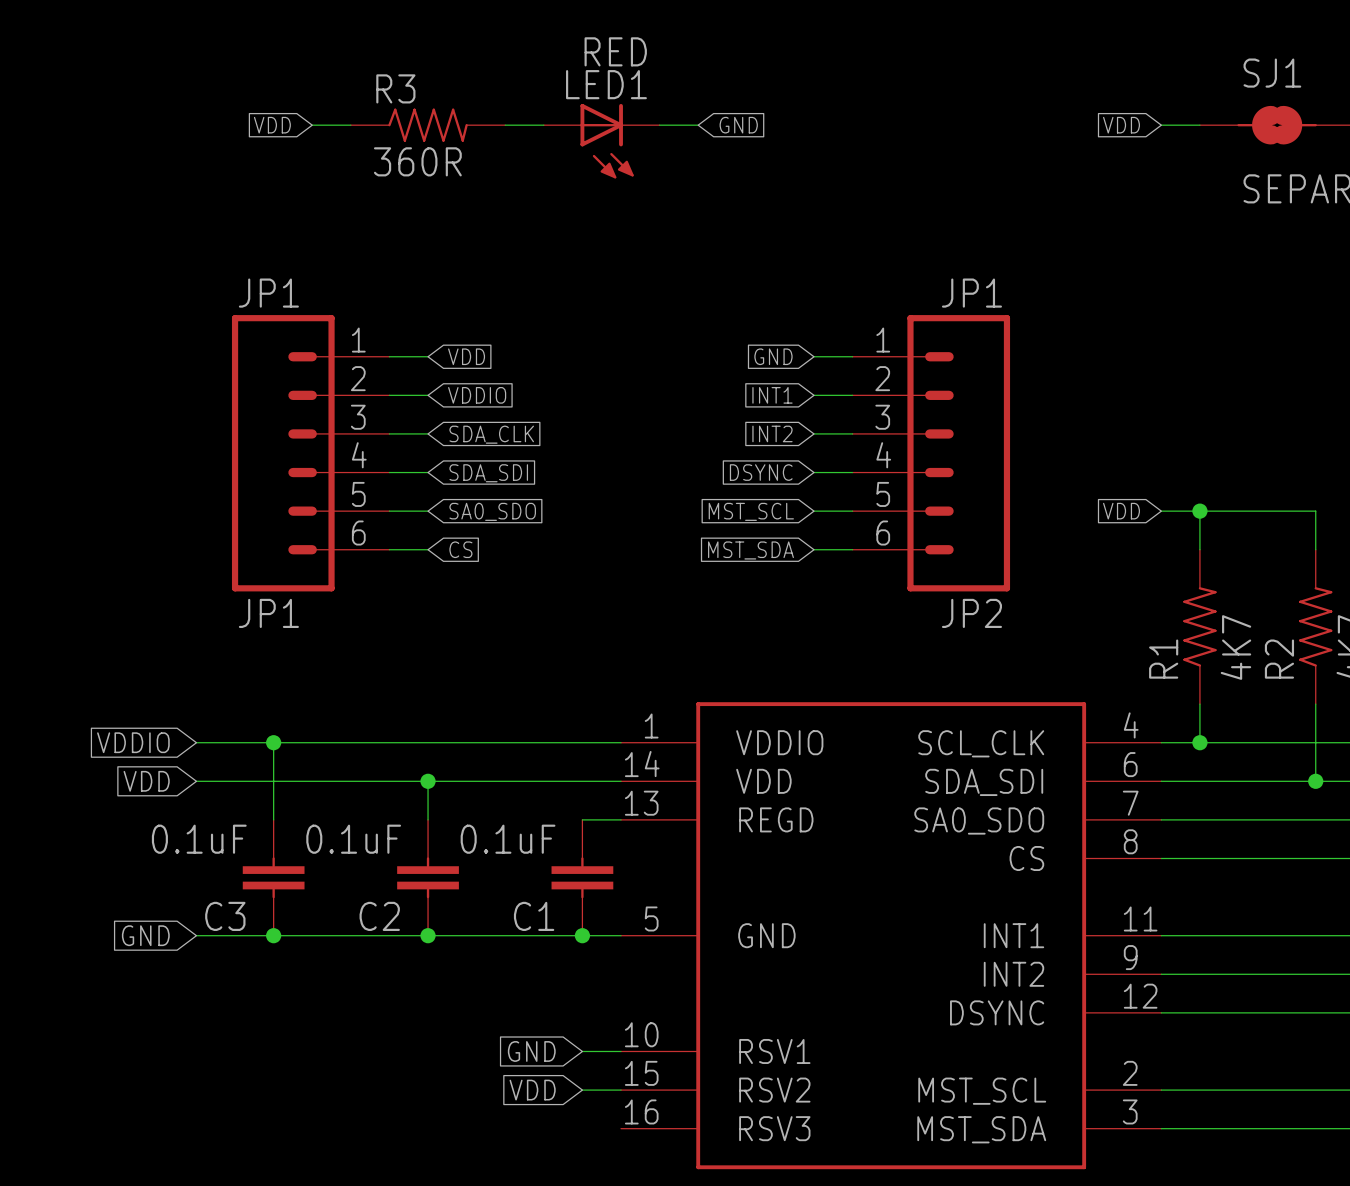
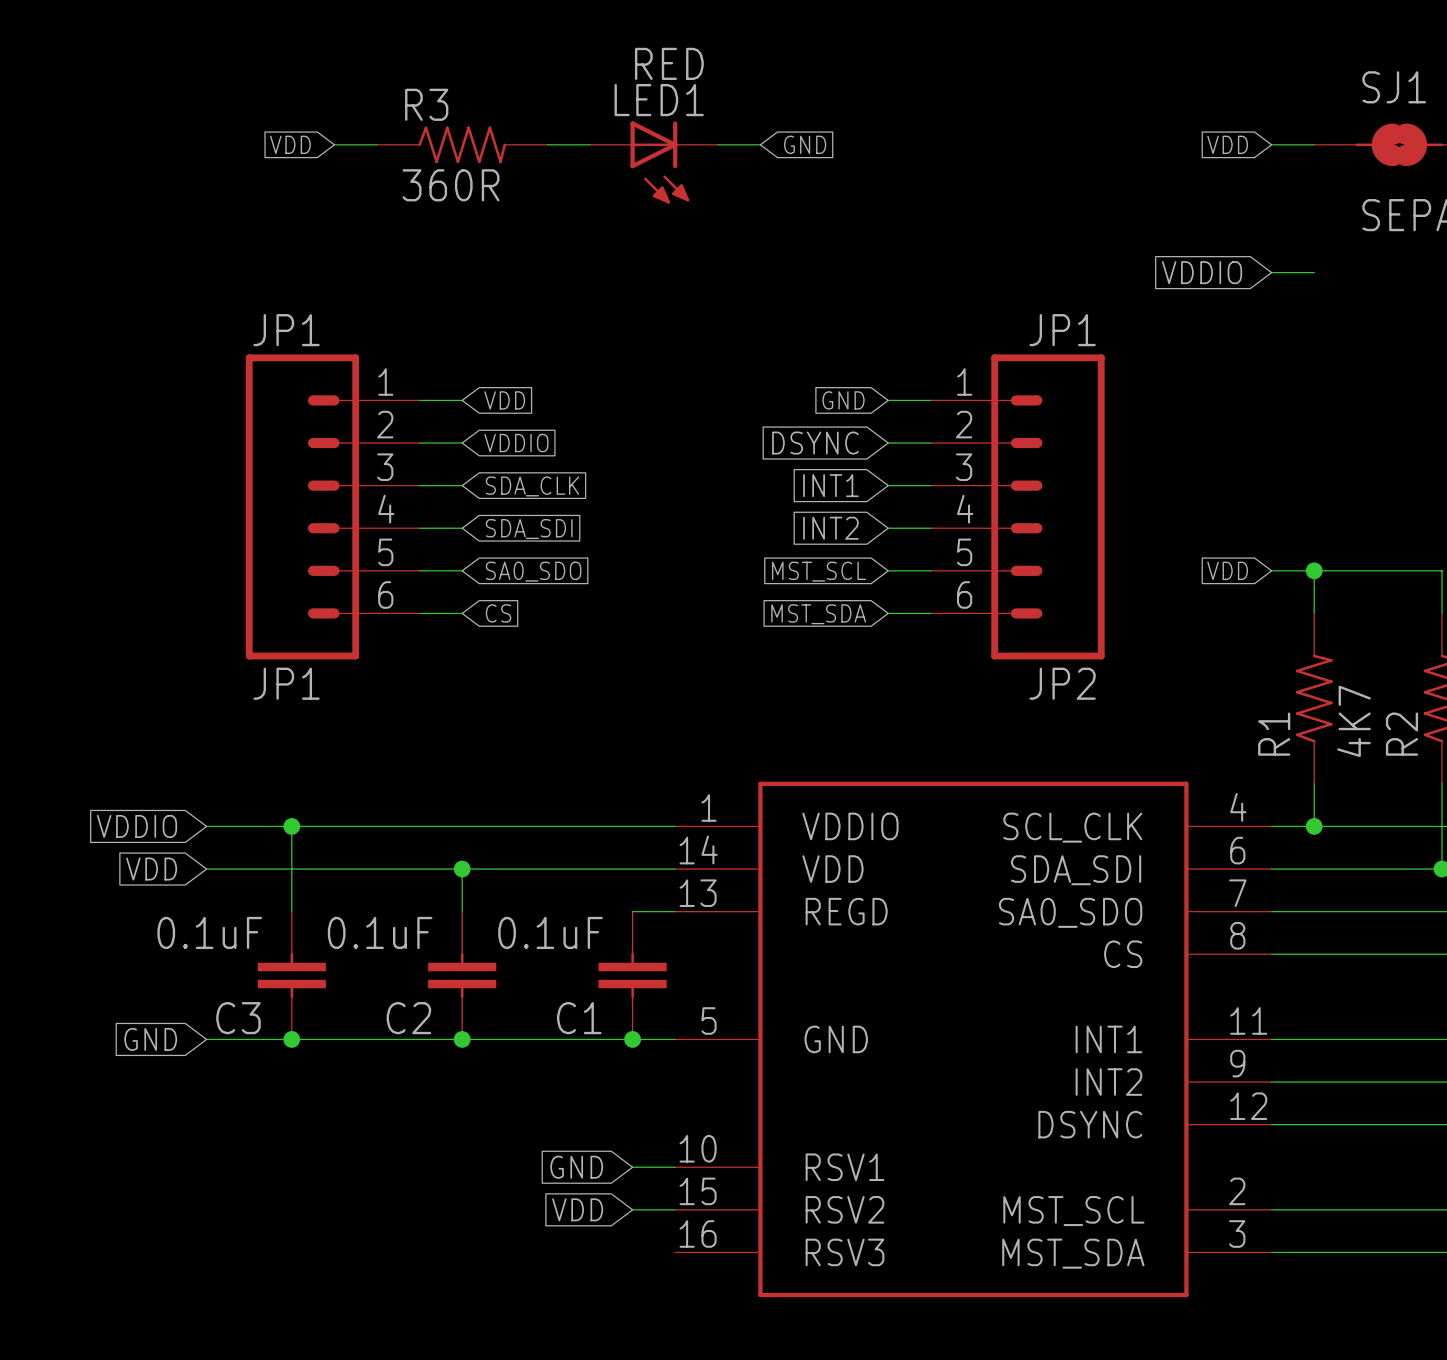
global label: none -> VDDIO (1202, 272)
wire: none -> (1271, 272) (1314, 272)
global label: INT1 (772, 395) -> DSYNC (815, 443)
global label: INT2 (772, 433) -> INT1 (830, 485)
global label: DSYNC (761, 472) -> INT2 (830, 528)

